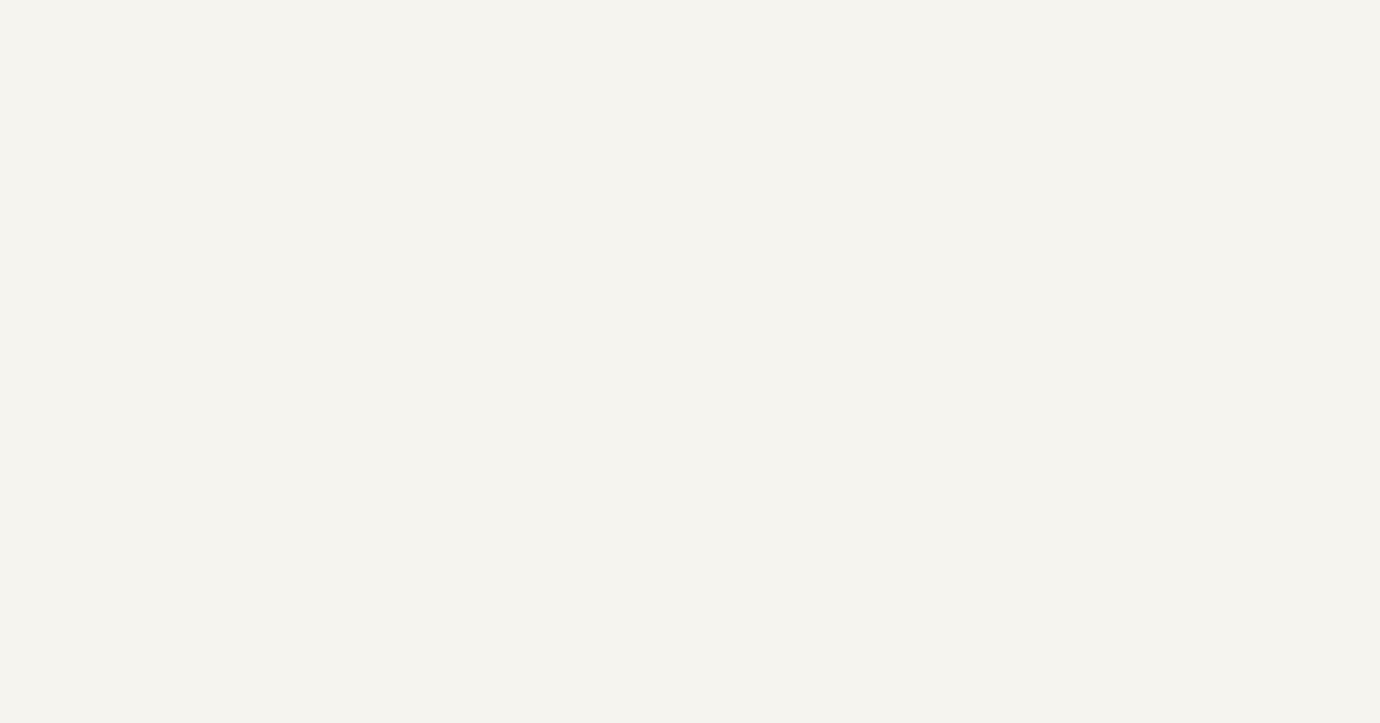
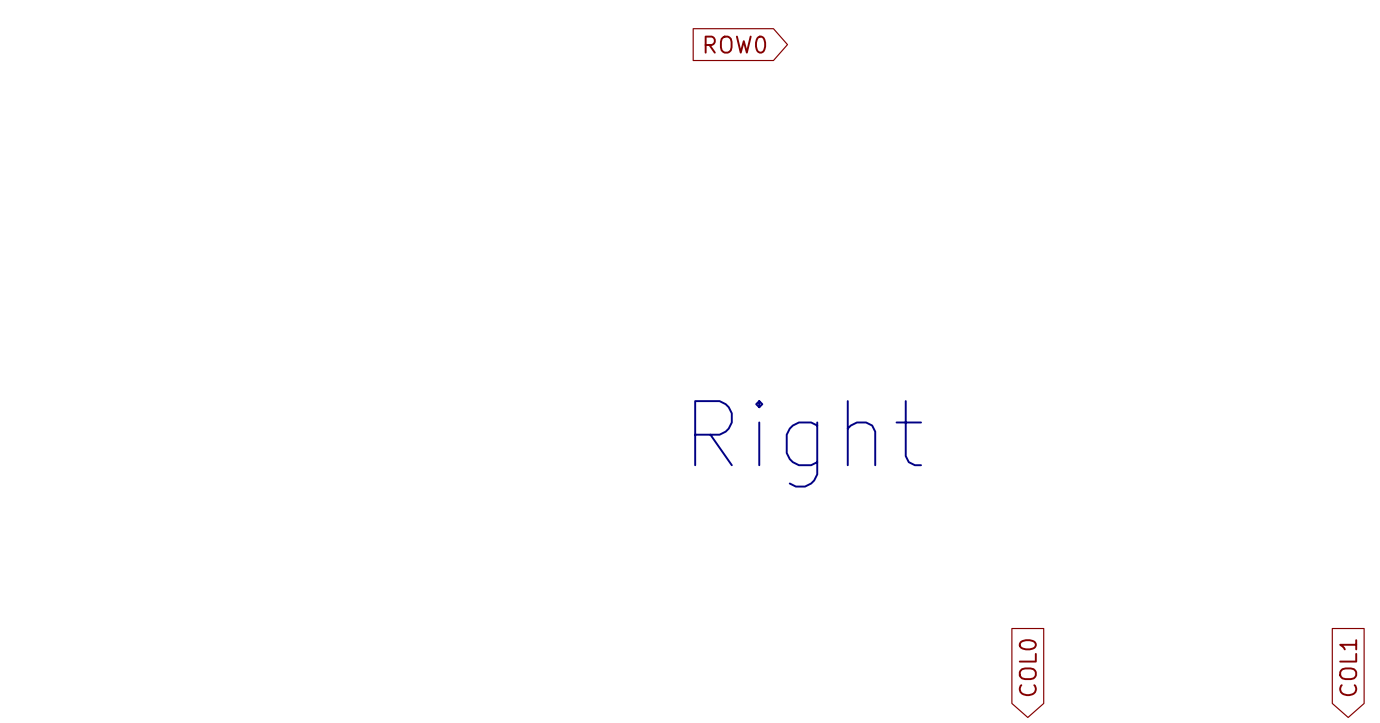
global label: none -> ROW0 (735, 44)
text: none -> Right (808, 443)
global label: none -> COL0 (1027, 667)
global label: none -> COL1 (1348, 667)

